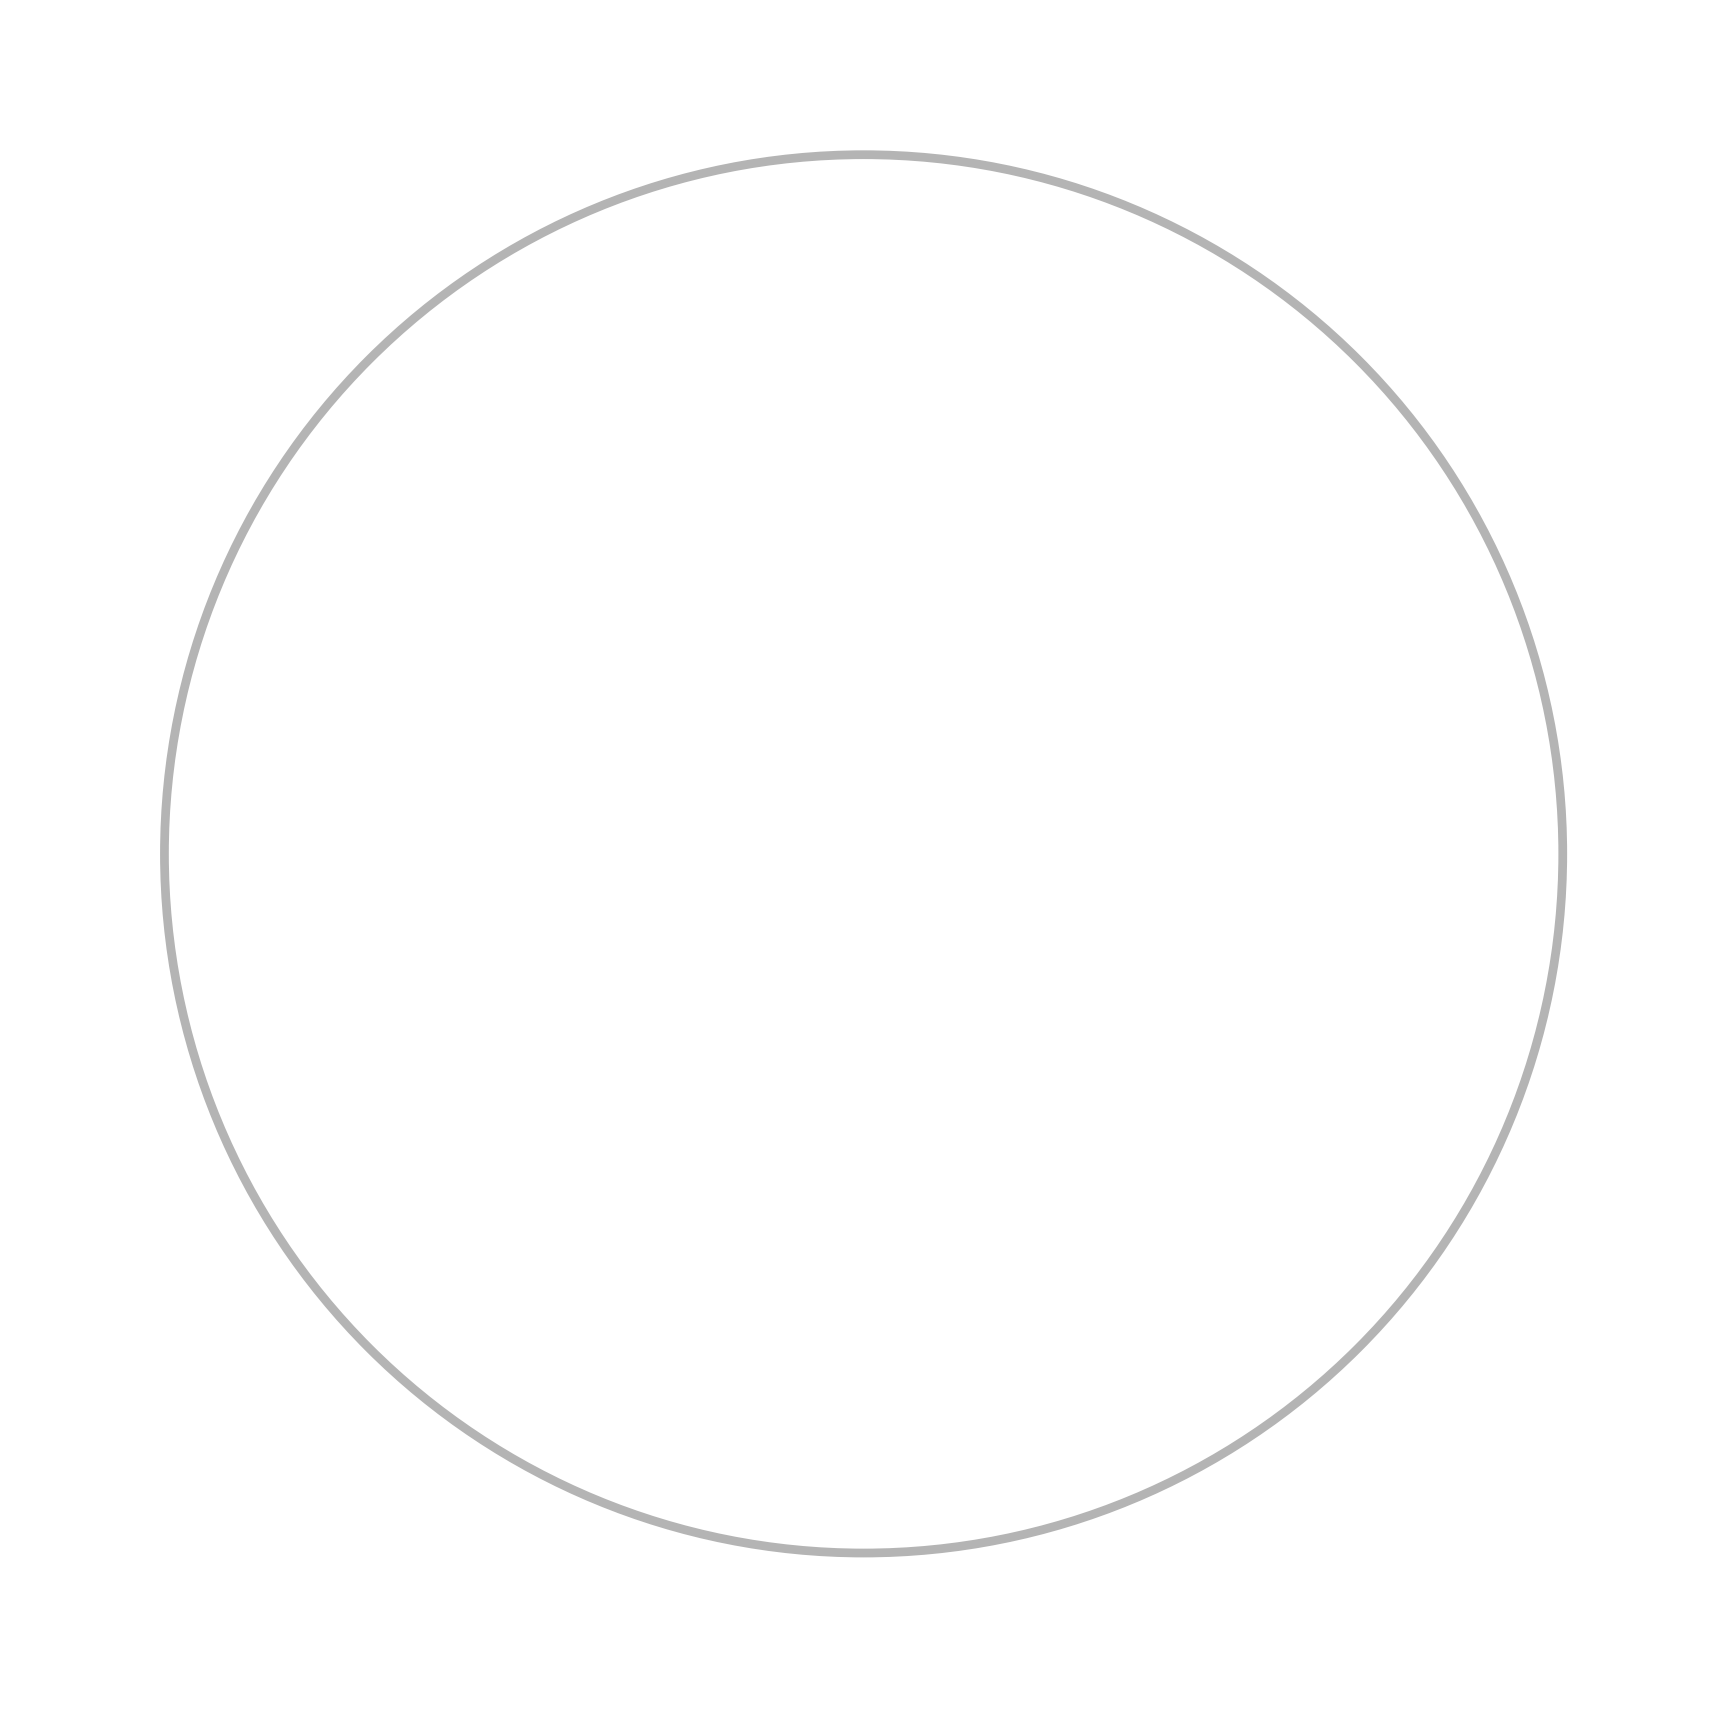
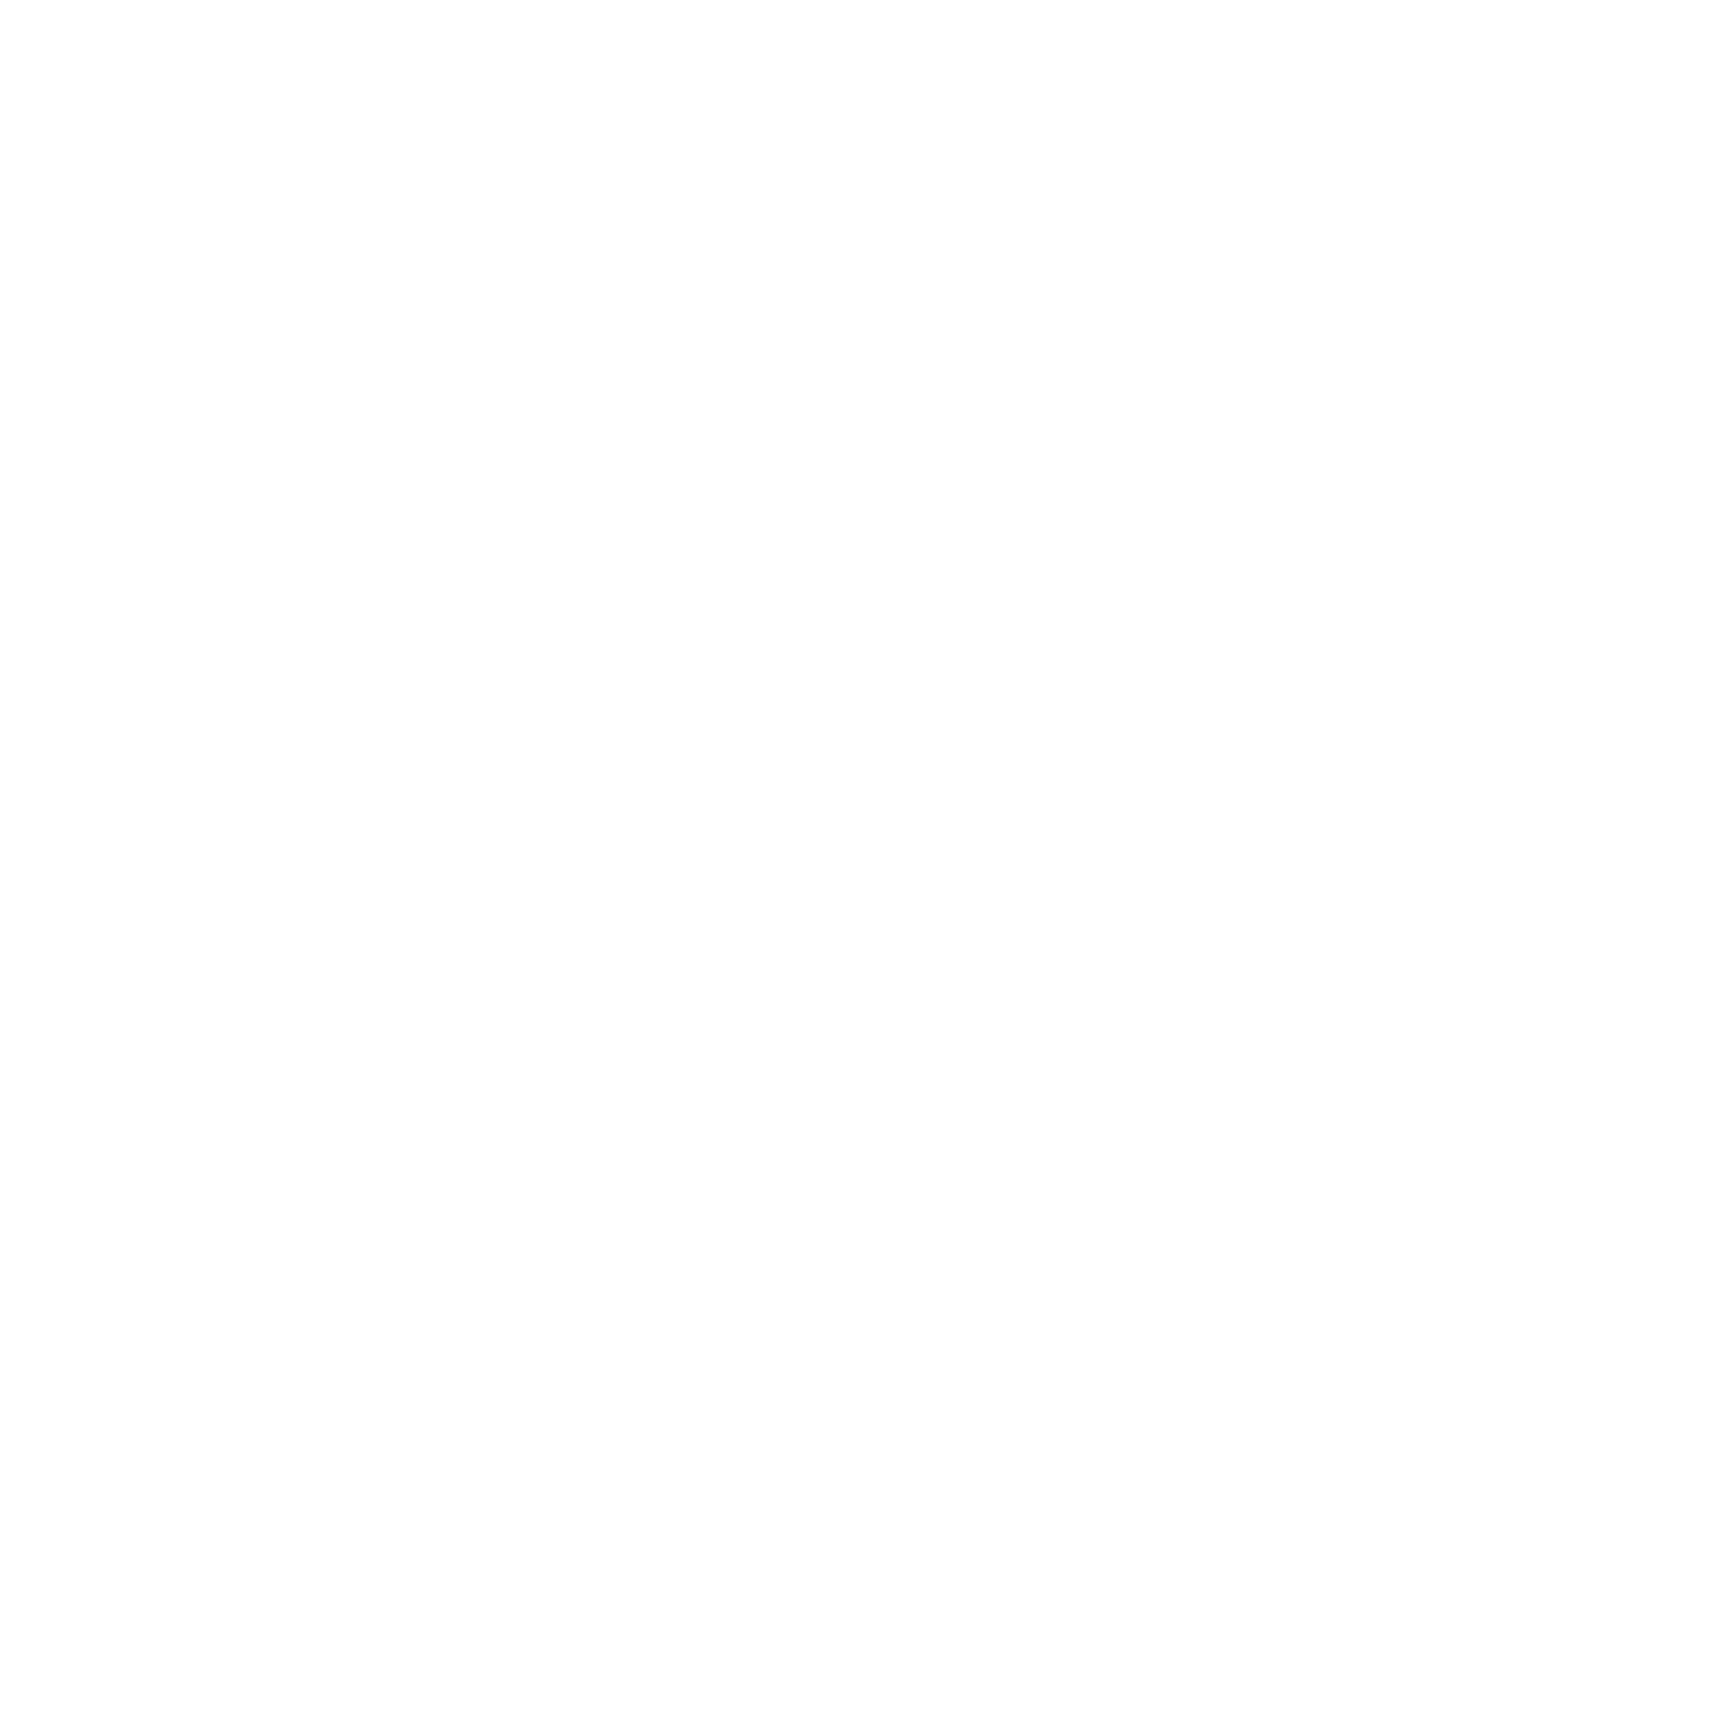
drawing: [160, 150, 1568, 1558] -> none

